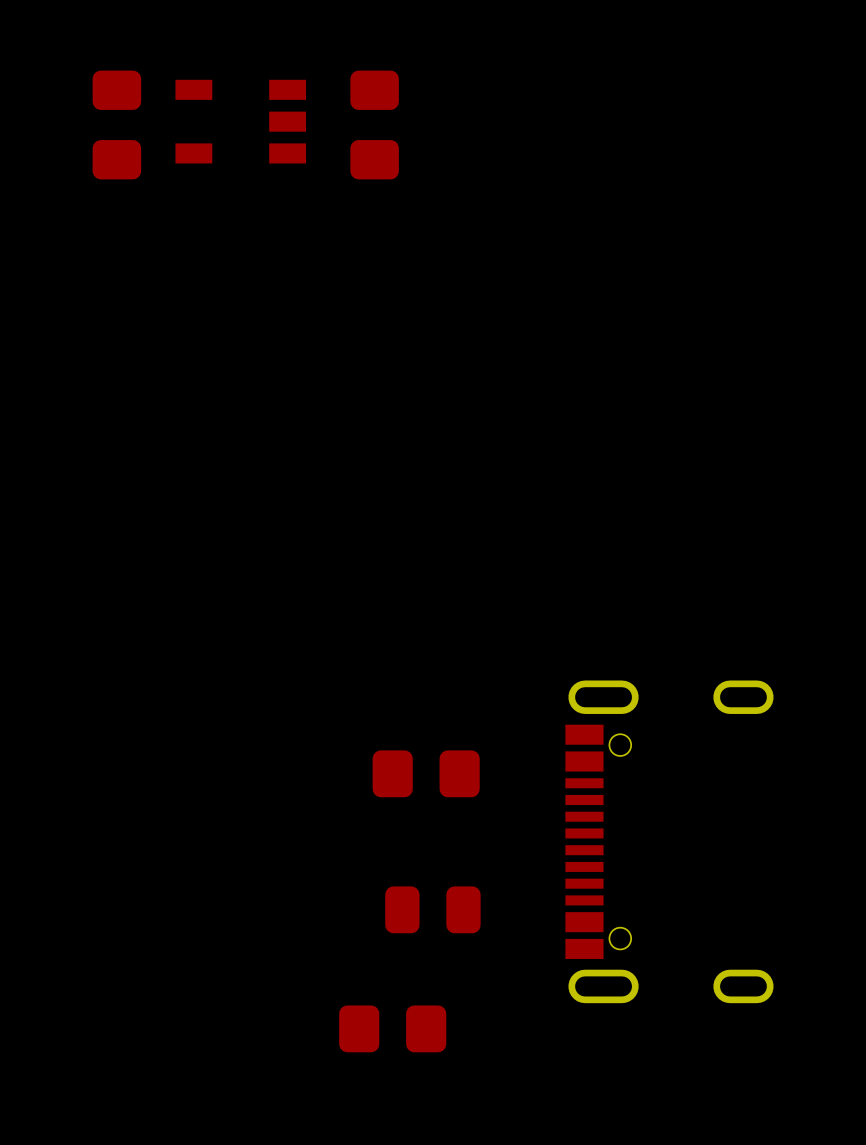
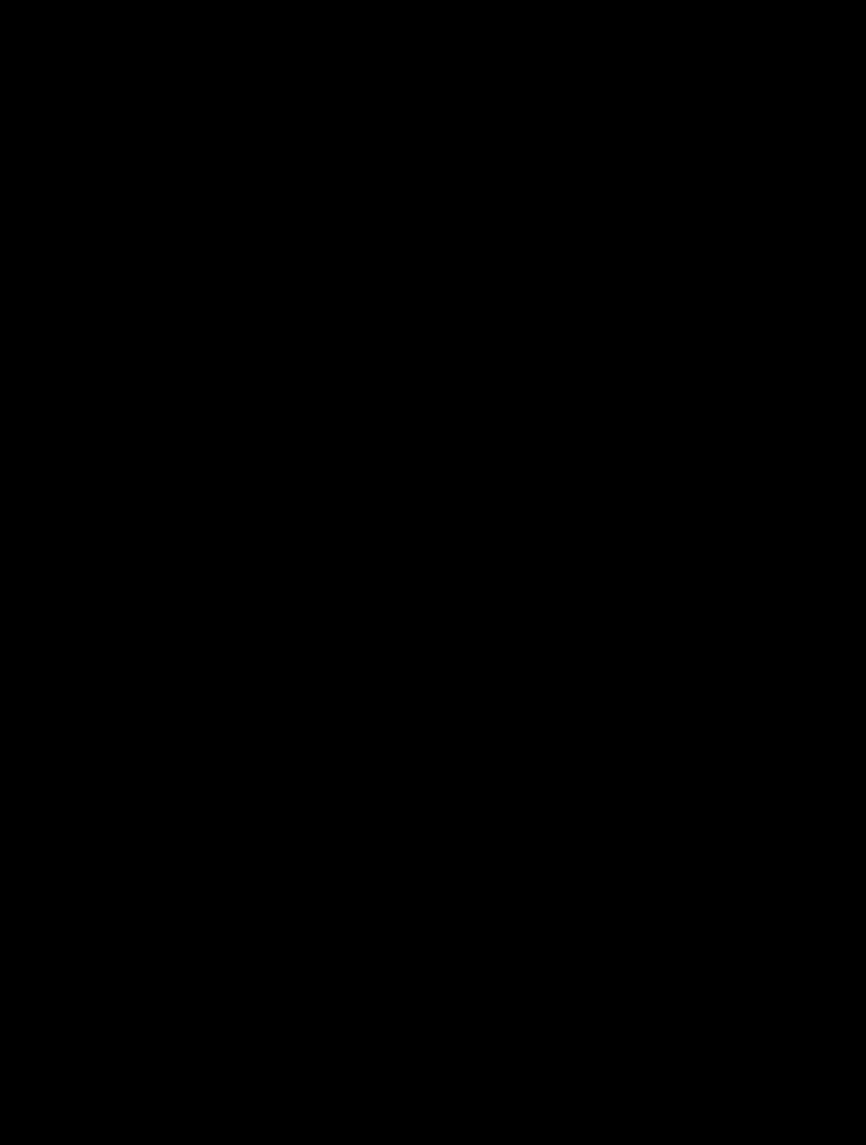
part: (240, 121) -> none
part: (116, 124) -> none
part: (374, 124) -> none
part: (426, 773) -> none
part: (669, 841) -> none
part: (432, 909) -> none
part: (392, 1028) -> none

